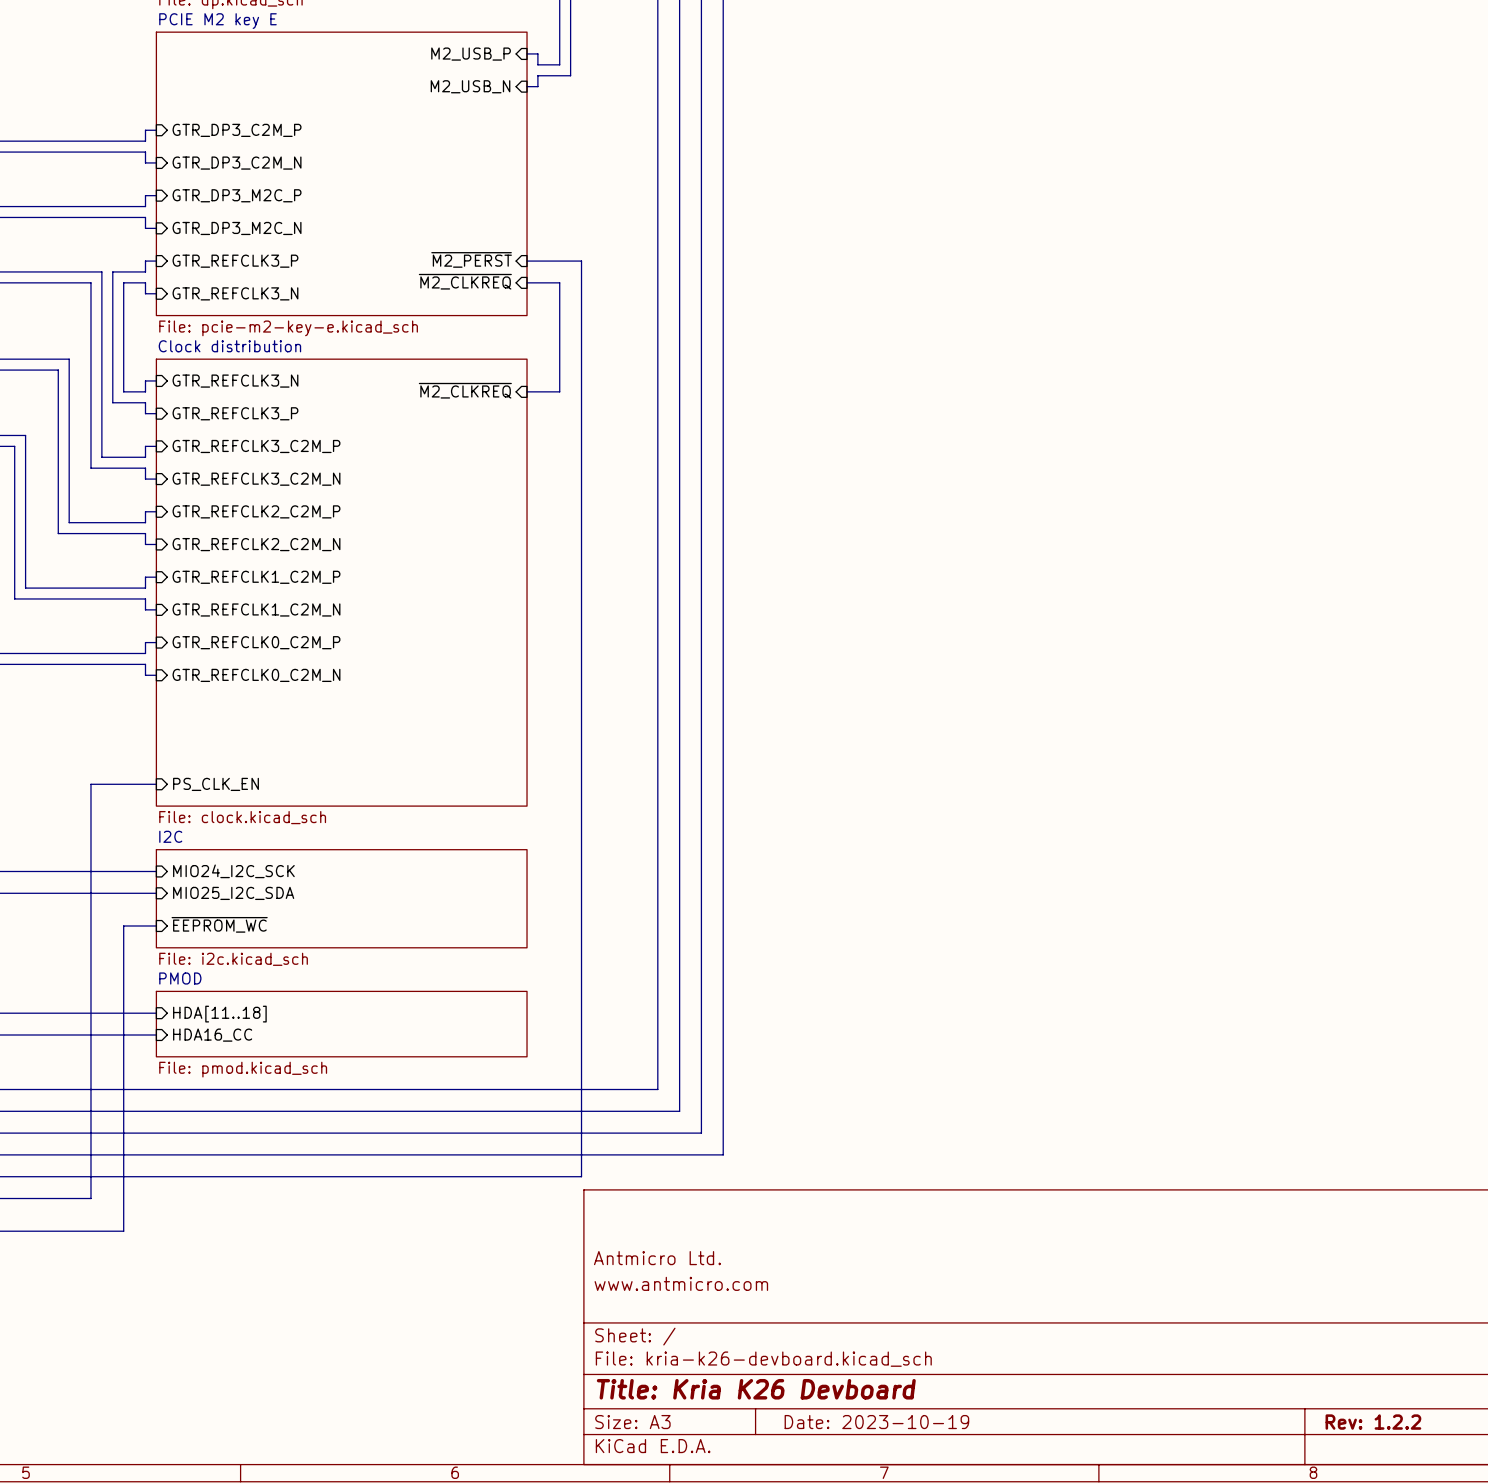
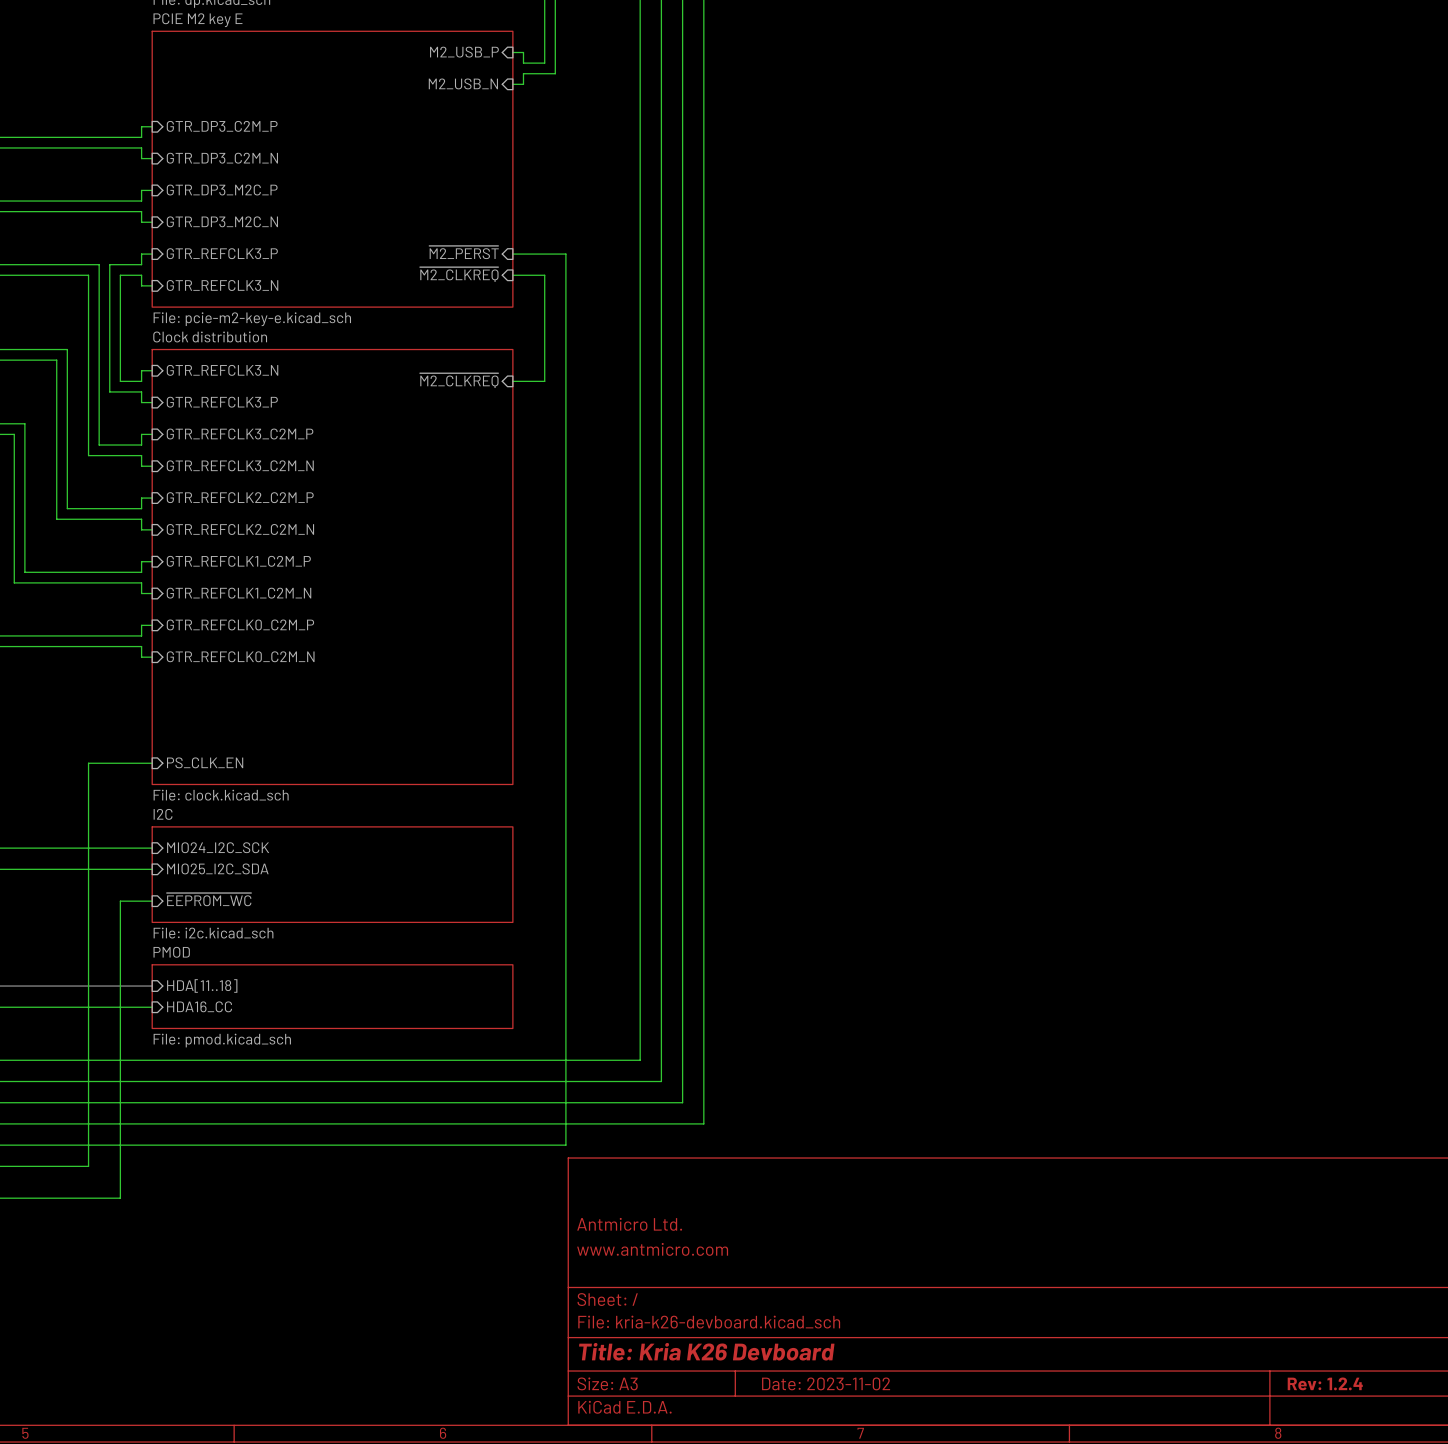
title block: Date: 2023-10-19 (876, 1422) -> Date: 2023-11-02 (826, 1383)
title block: Rev: 1.2.2 (1373, 1422) -> Rev: 1.2.4 (1325, 1383)

